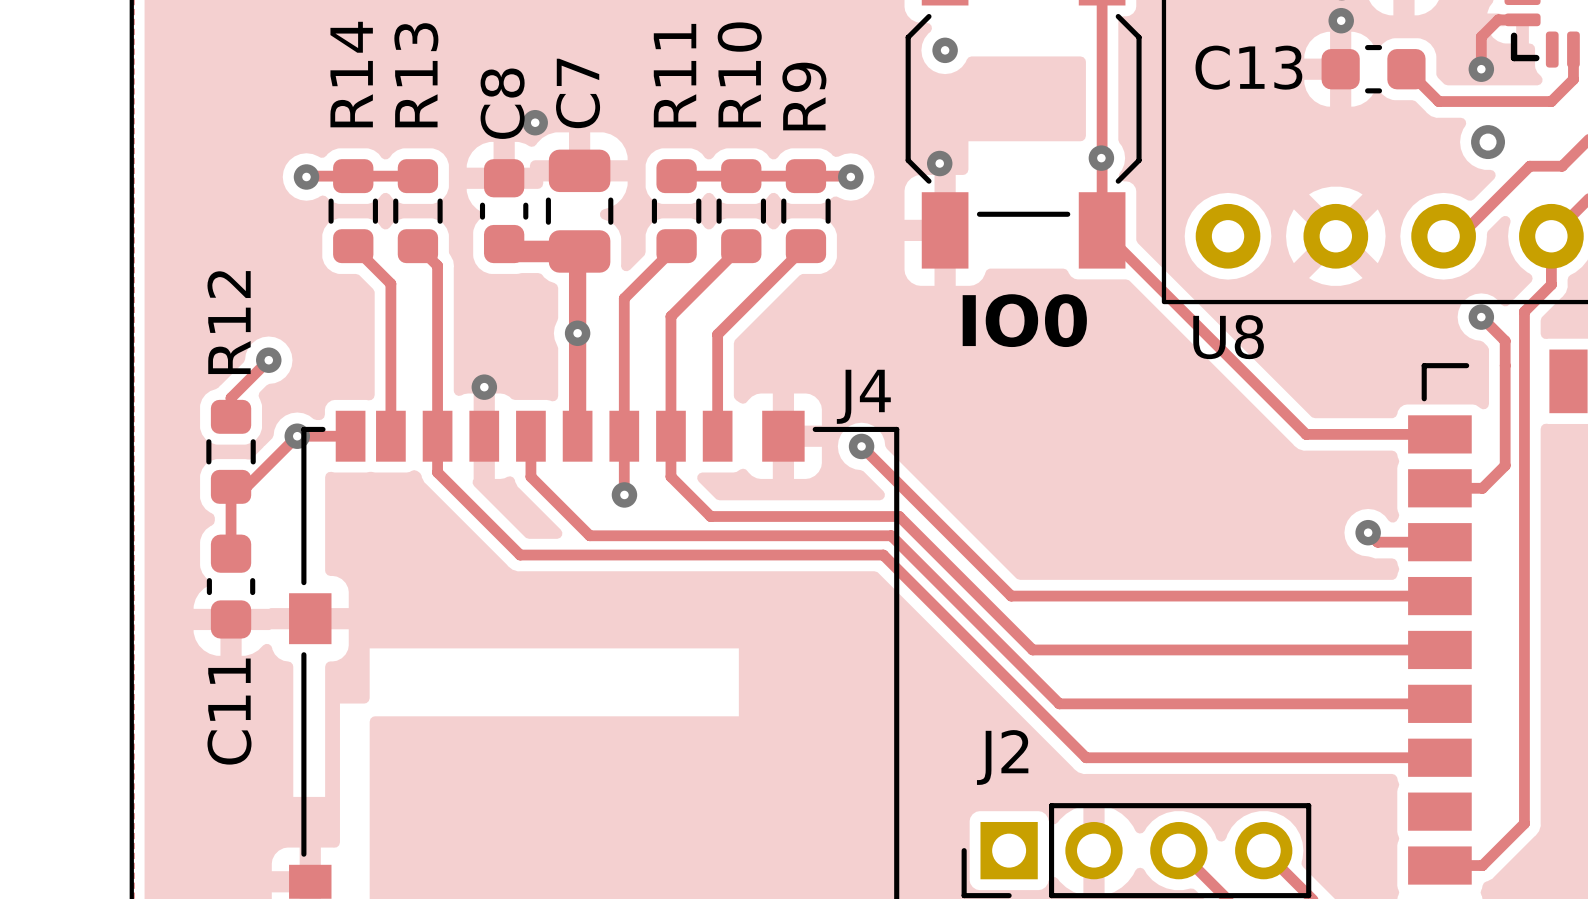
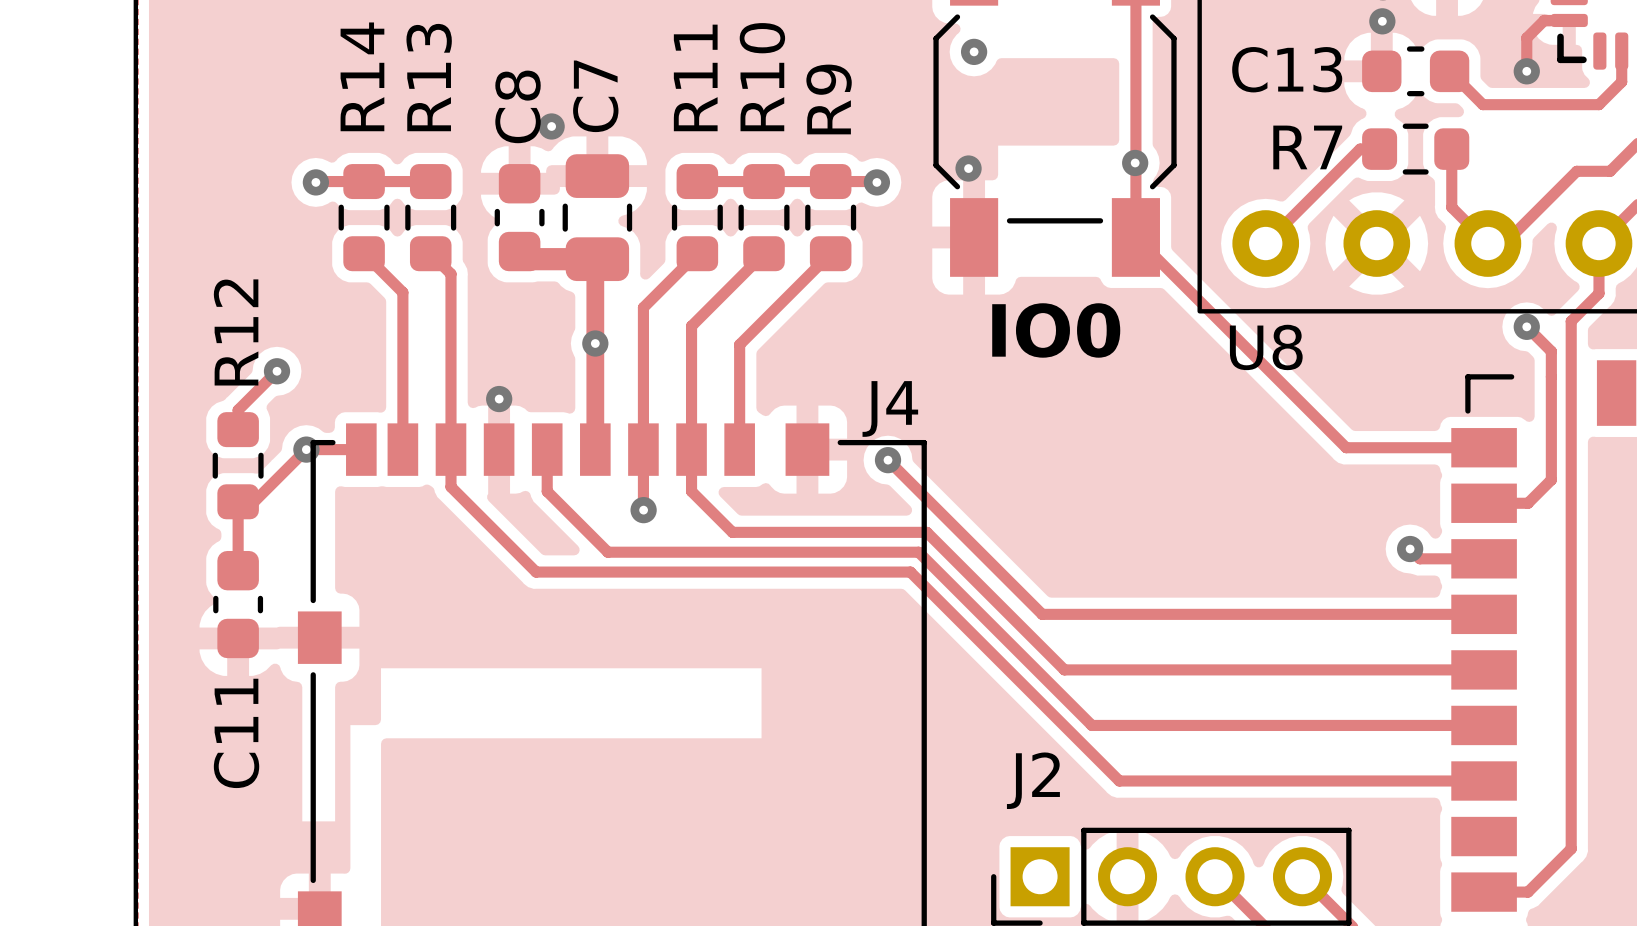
via: (1488, 142) -> none
track: none -> (1379, 149) (1360, 149) (1265, 243)
R7: none -> (1415, 149)
track: none -> (1451, 149) (1451, 207) (1487, 243)

